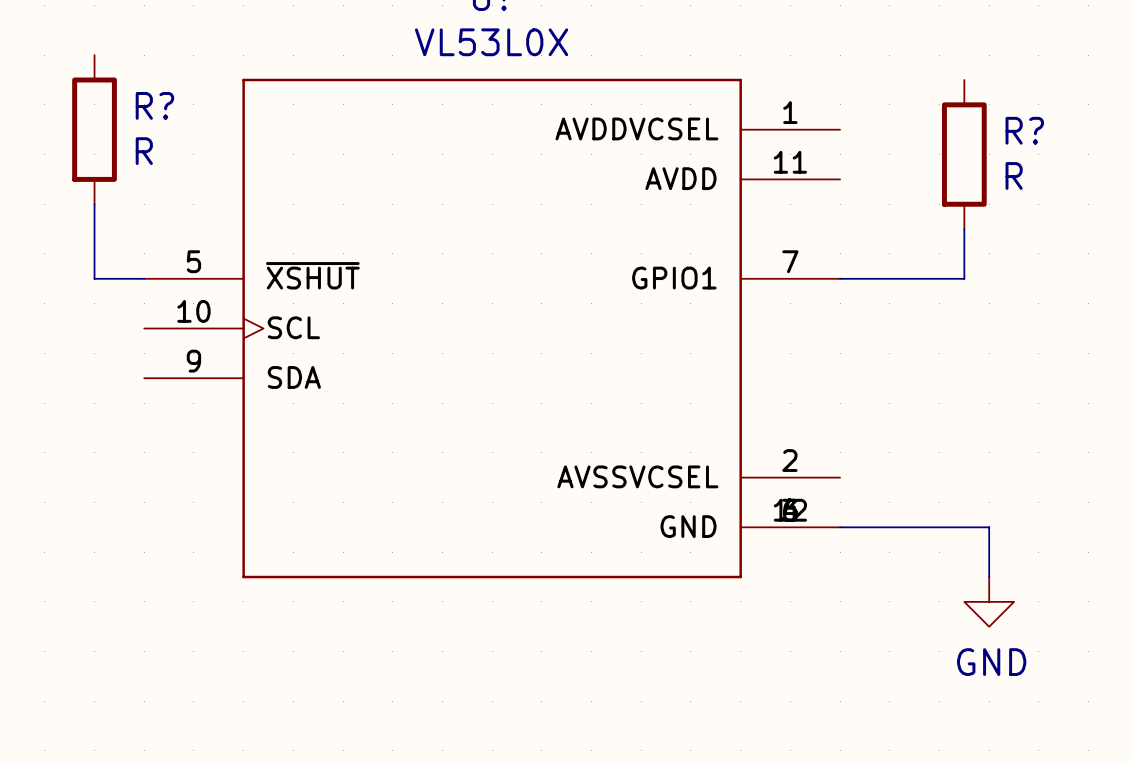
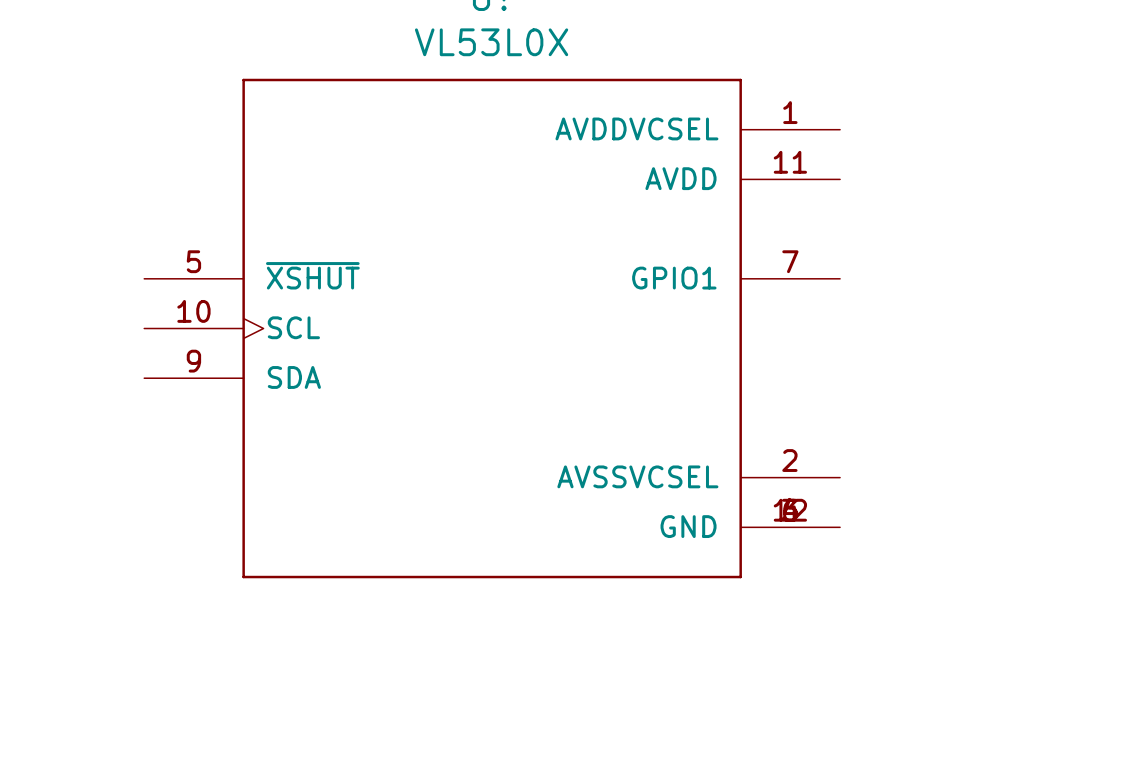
R?: R (94, 129) -> none
R?: R (964, 154) -> none
wire: (94, 204) (94, 278) (144, 278) -> none
wire: (964, 229) (964, 278) (840, 278) -> none
wire: (840, 527) (989, 527) (989, 577) -> none
power symbol: GND (989, 601) -> none

